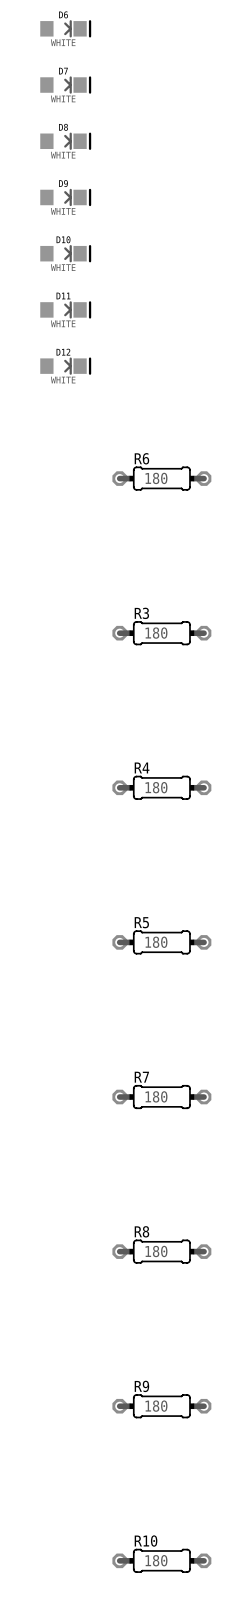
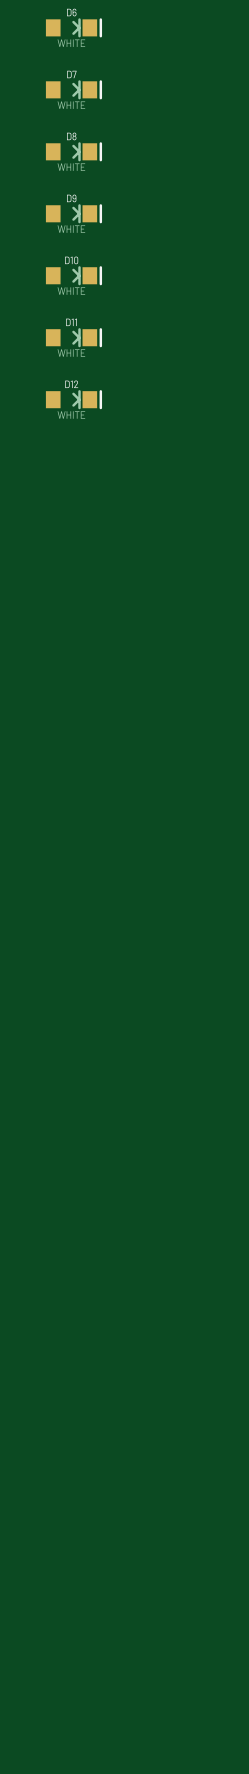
R6: 180 (161, 478) -> none
R3: 180 (161, 633) -> none
R4: 180 (161, 787) -> none
R5: 180 (161, 942) -> none
R7: 180 (161, 1097) -> none
R8: 180 (161, 1251) -> none
R9: 180 (161, 1406) -> none
R10: 180 (161, 1560) -> none

